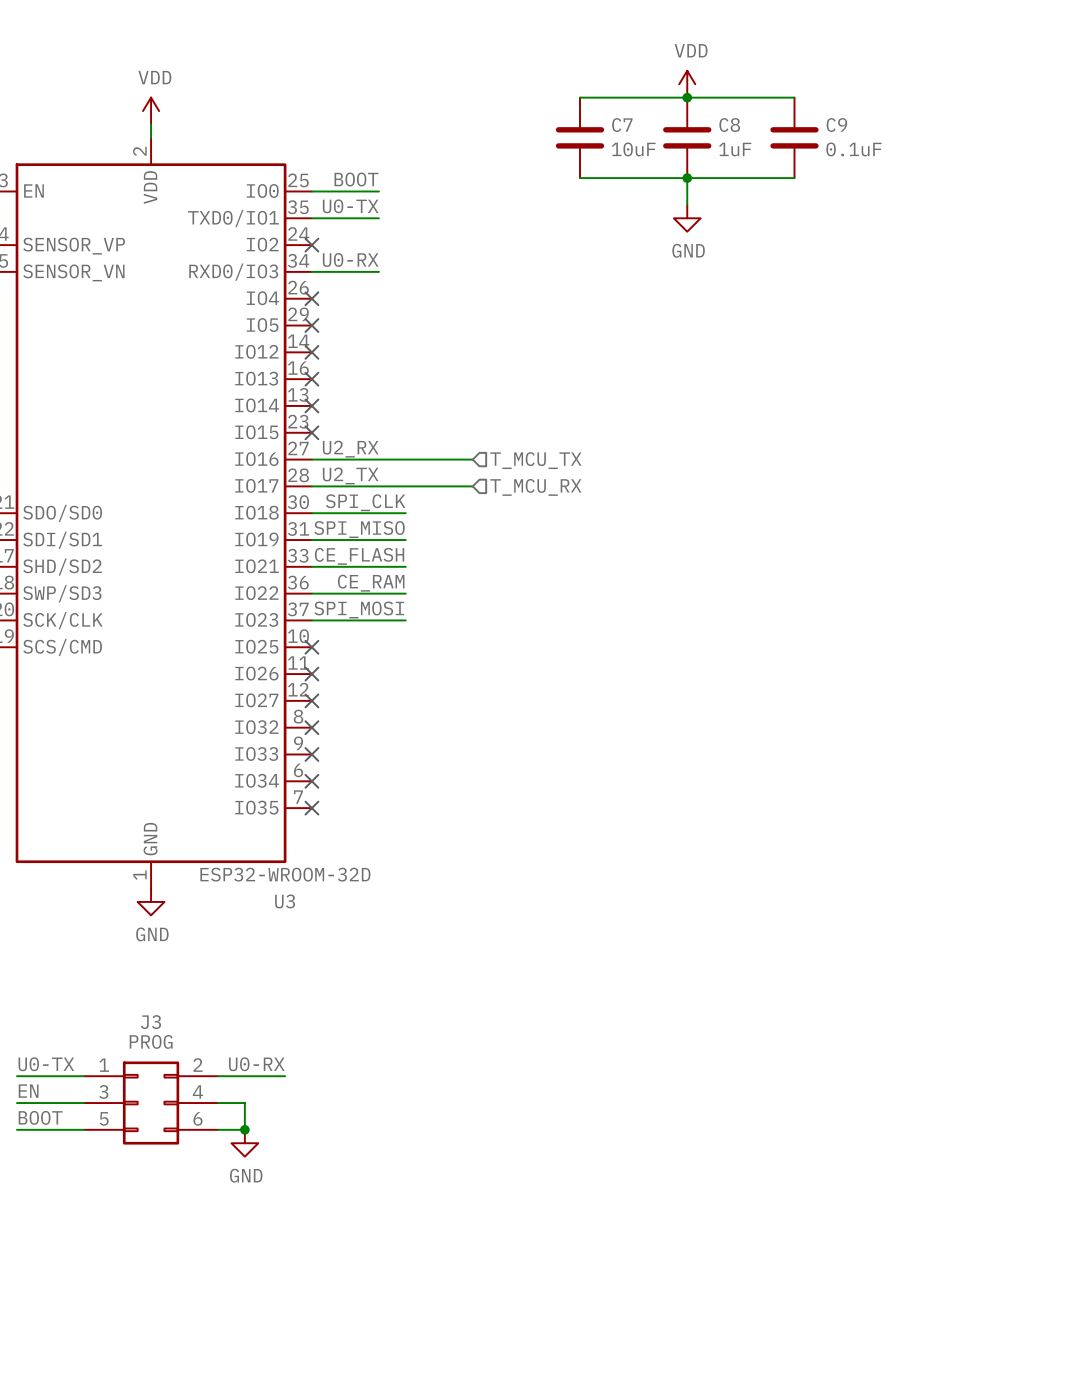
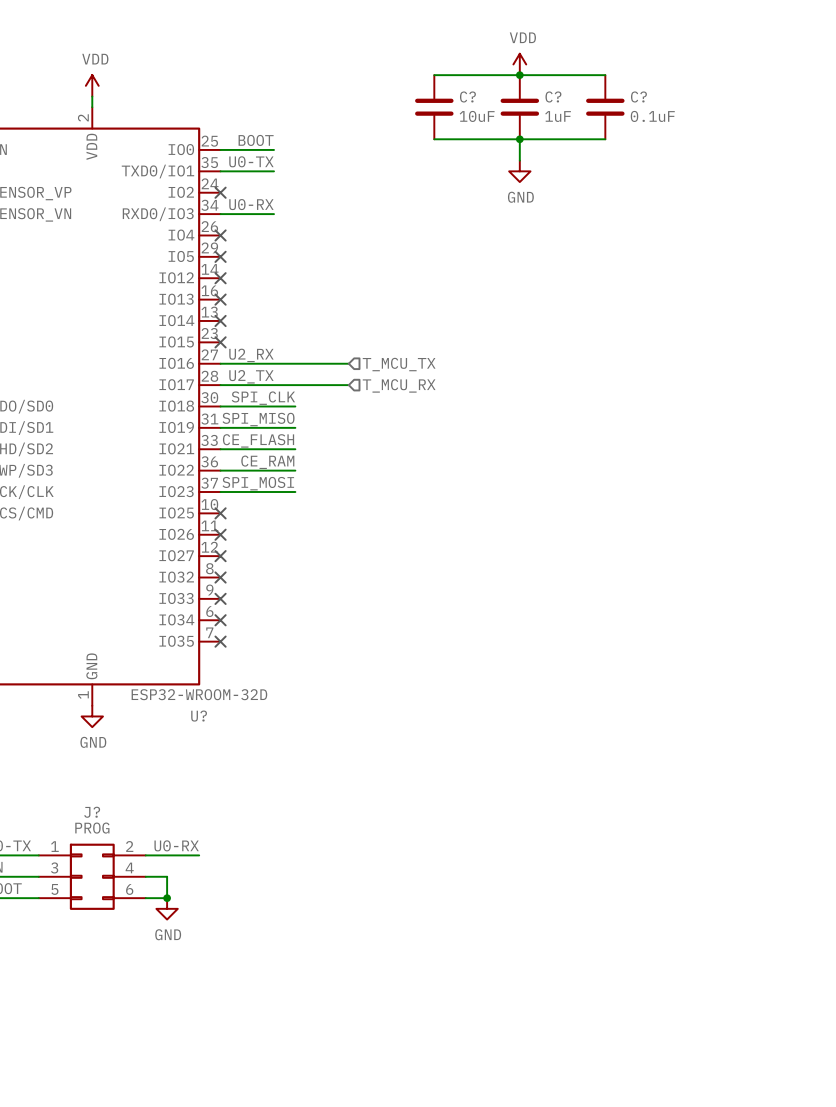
C7 name: C7 (622, 125) -> C? (467, 96)
C8 name: C8 (729, 125) -> C? (553, 96)
C9 name: C9 (836, 125) -> C? (638, 96)
U3 name: U3 (285, 901) -> U? (199, 716)
J3 name: J3 (150, 1022) -> J? (92, 812)

